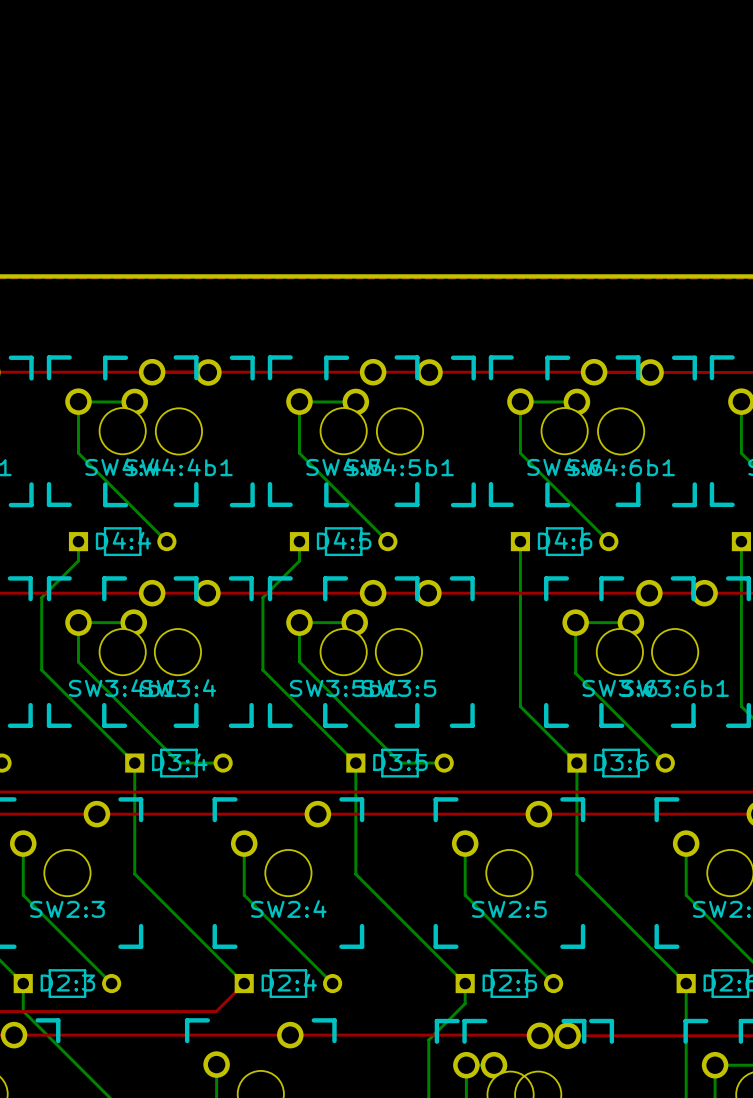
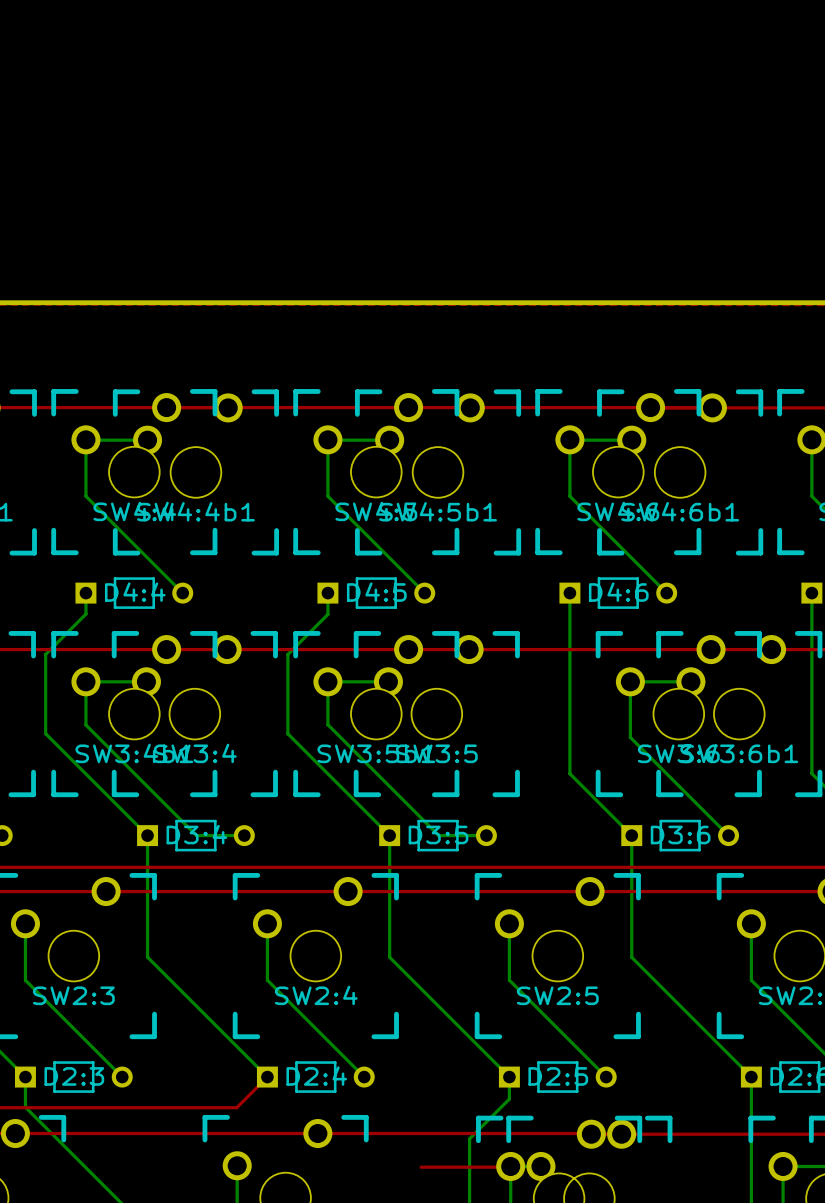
top track: none -> (510, 1166) (421, 1167)

